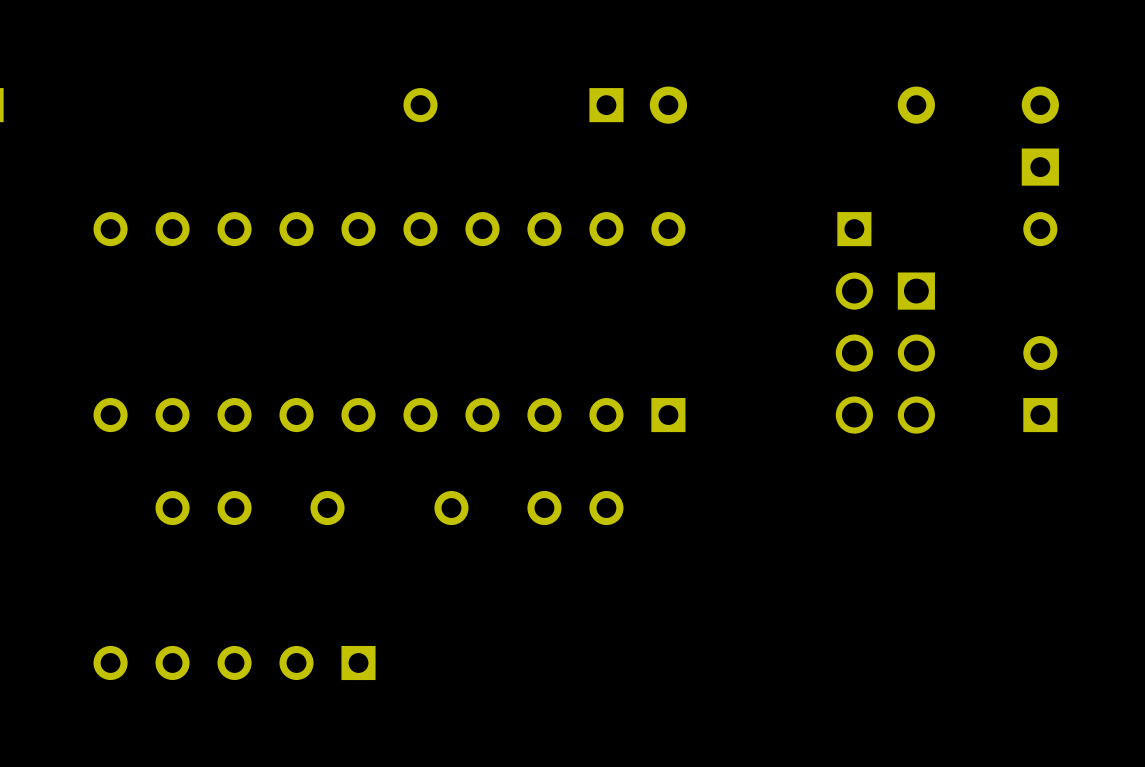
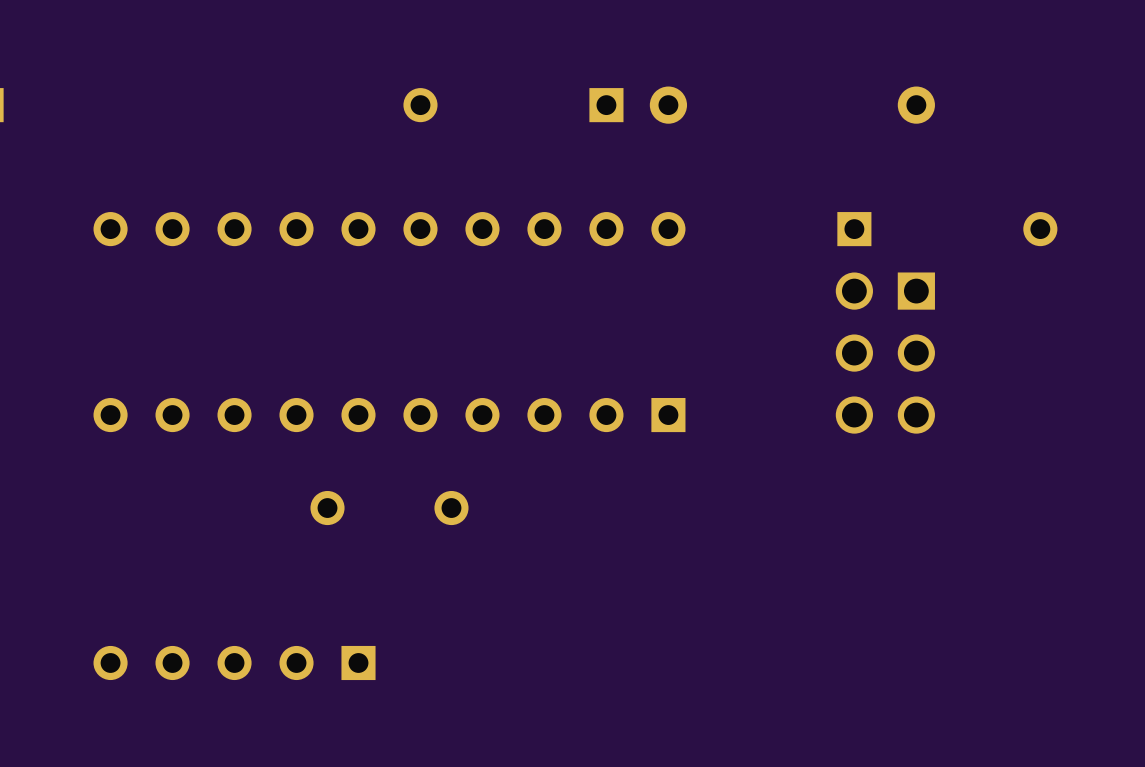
part: (1040, 136) -> none
part: (1040, 384) -> none
part: (203, 508) -> none
part: (575, 508) -> none

